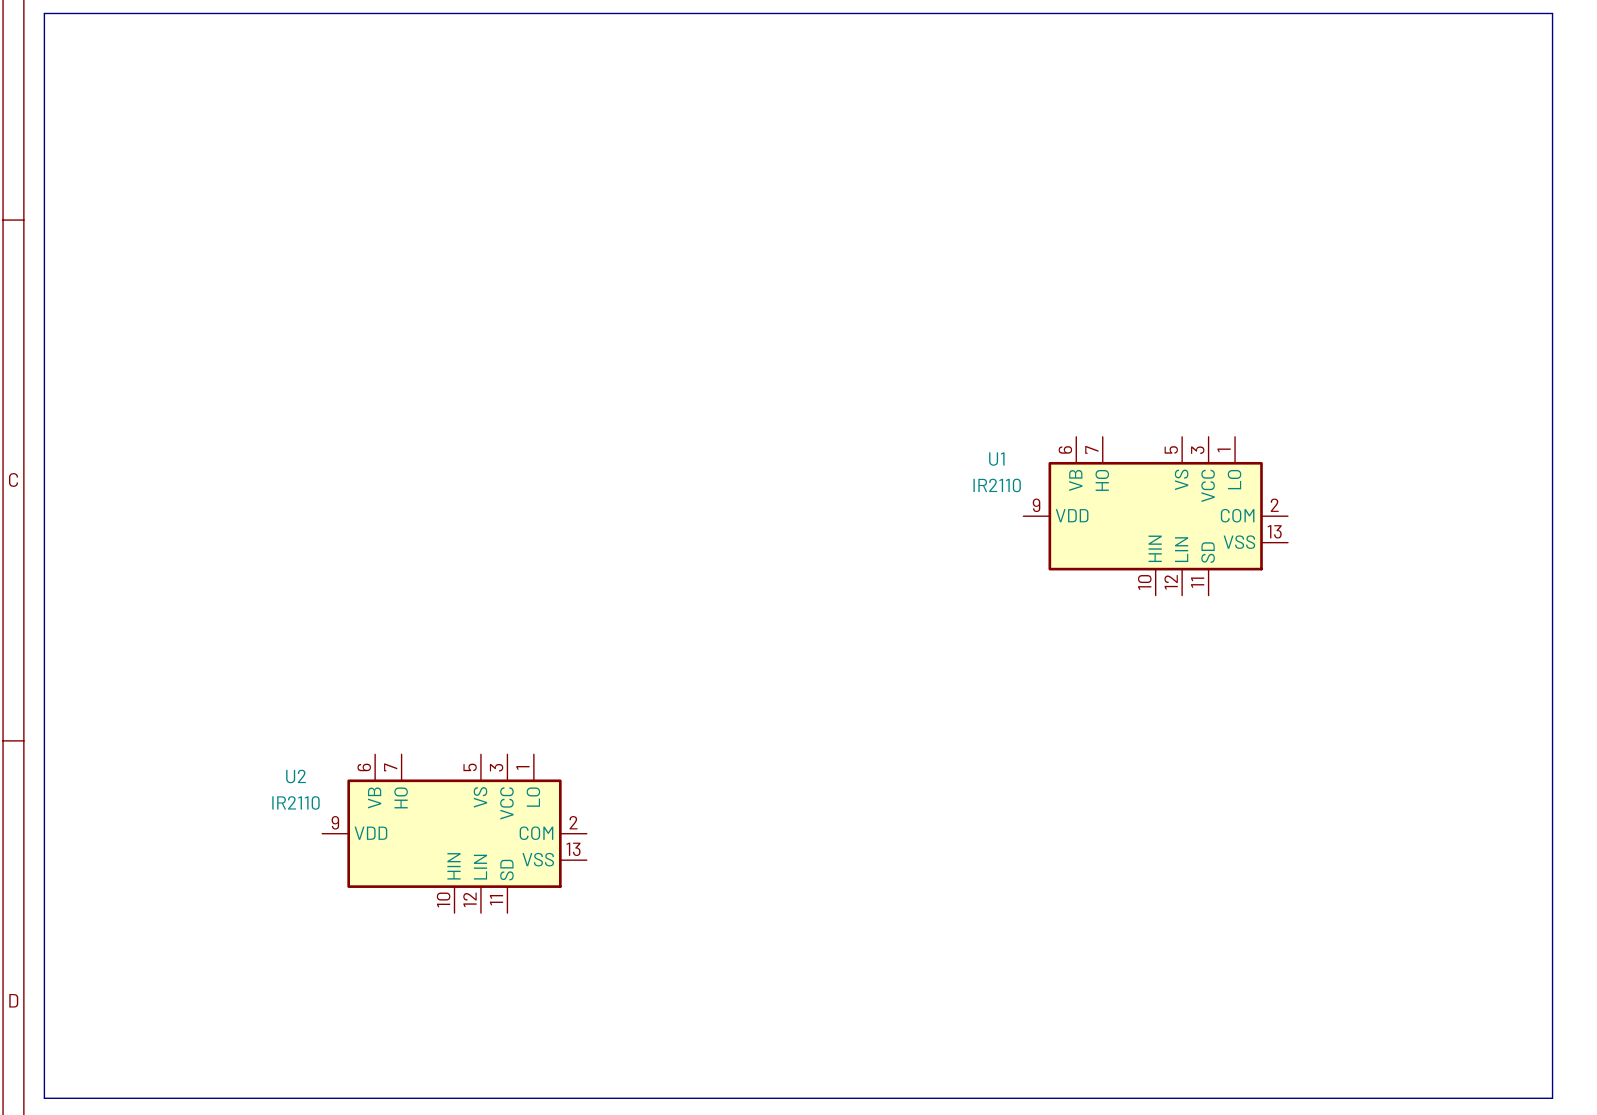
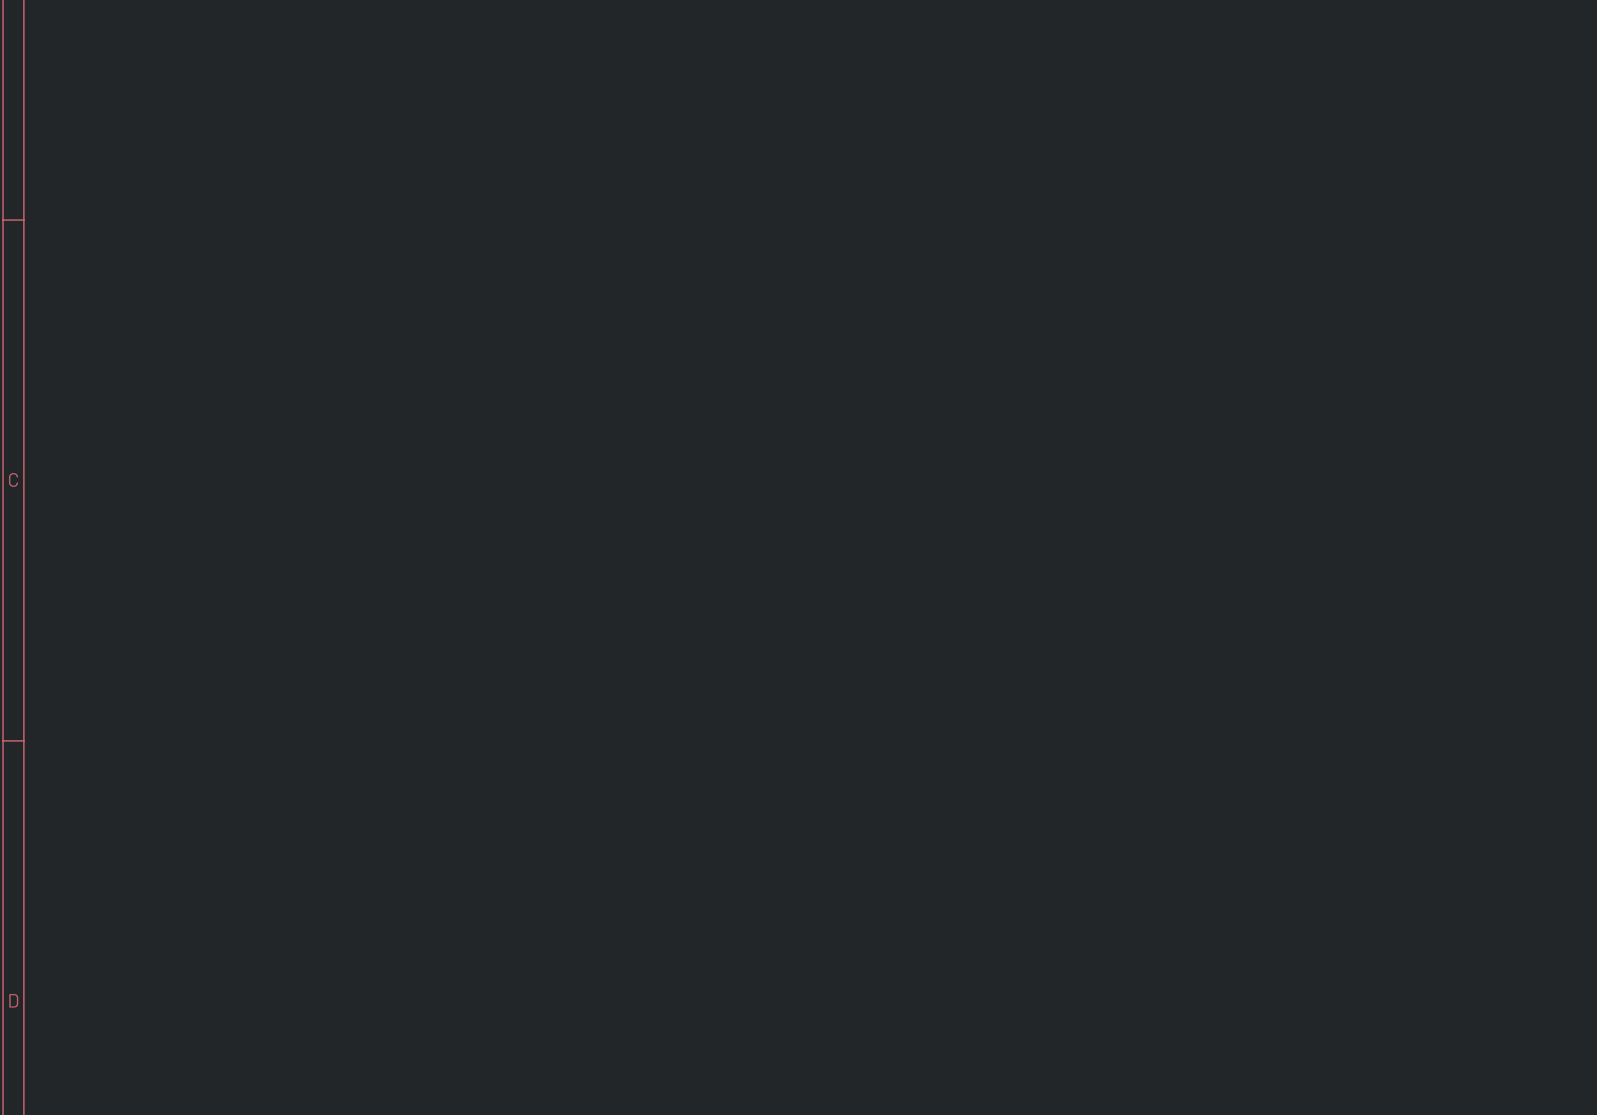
line: (44, 13) (1552, 13) (1552, 1098) (44, 1098) (44, 13) -> none
U1: IR2110 (1155, 516) -> none
U2: IR2110 (454, 833) -> none

